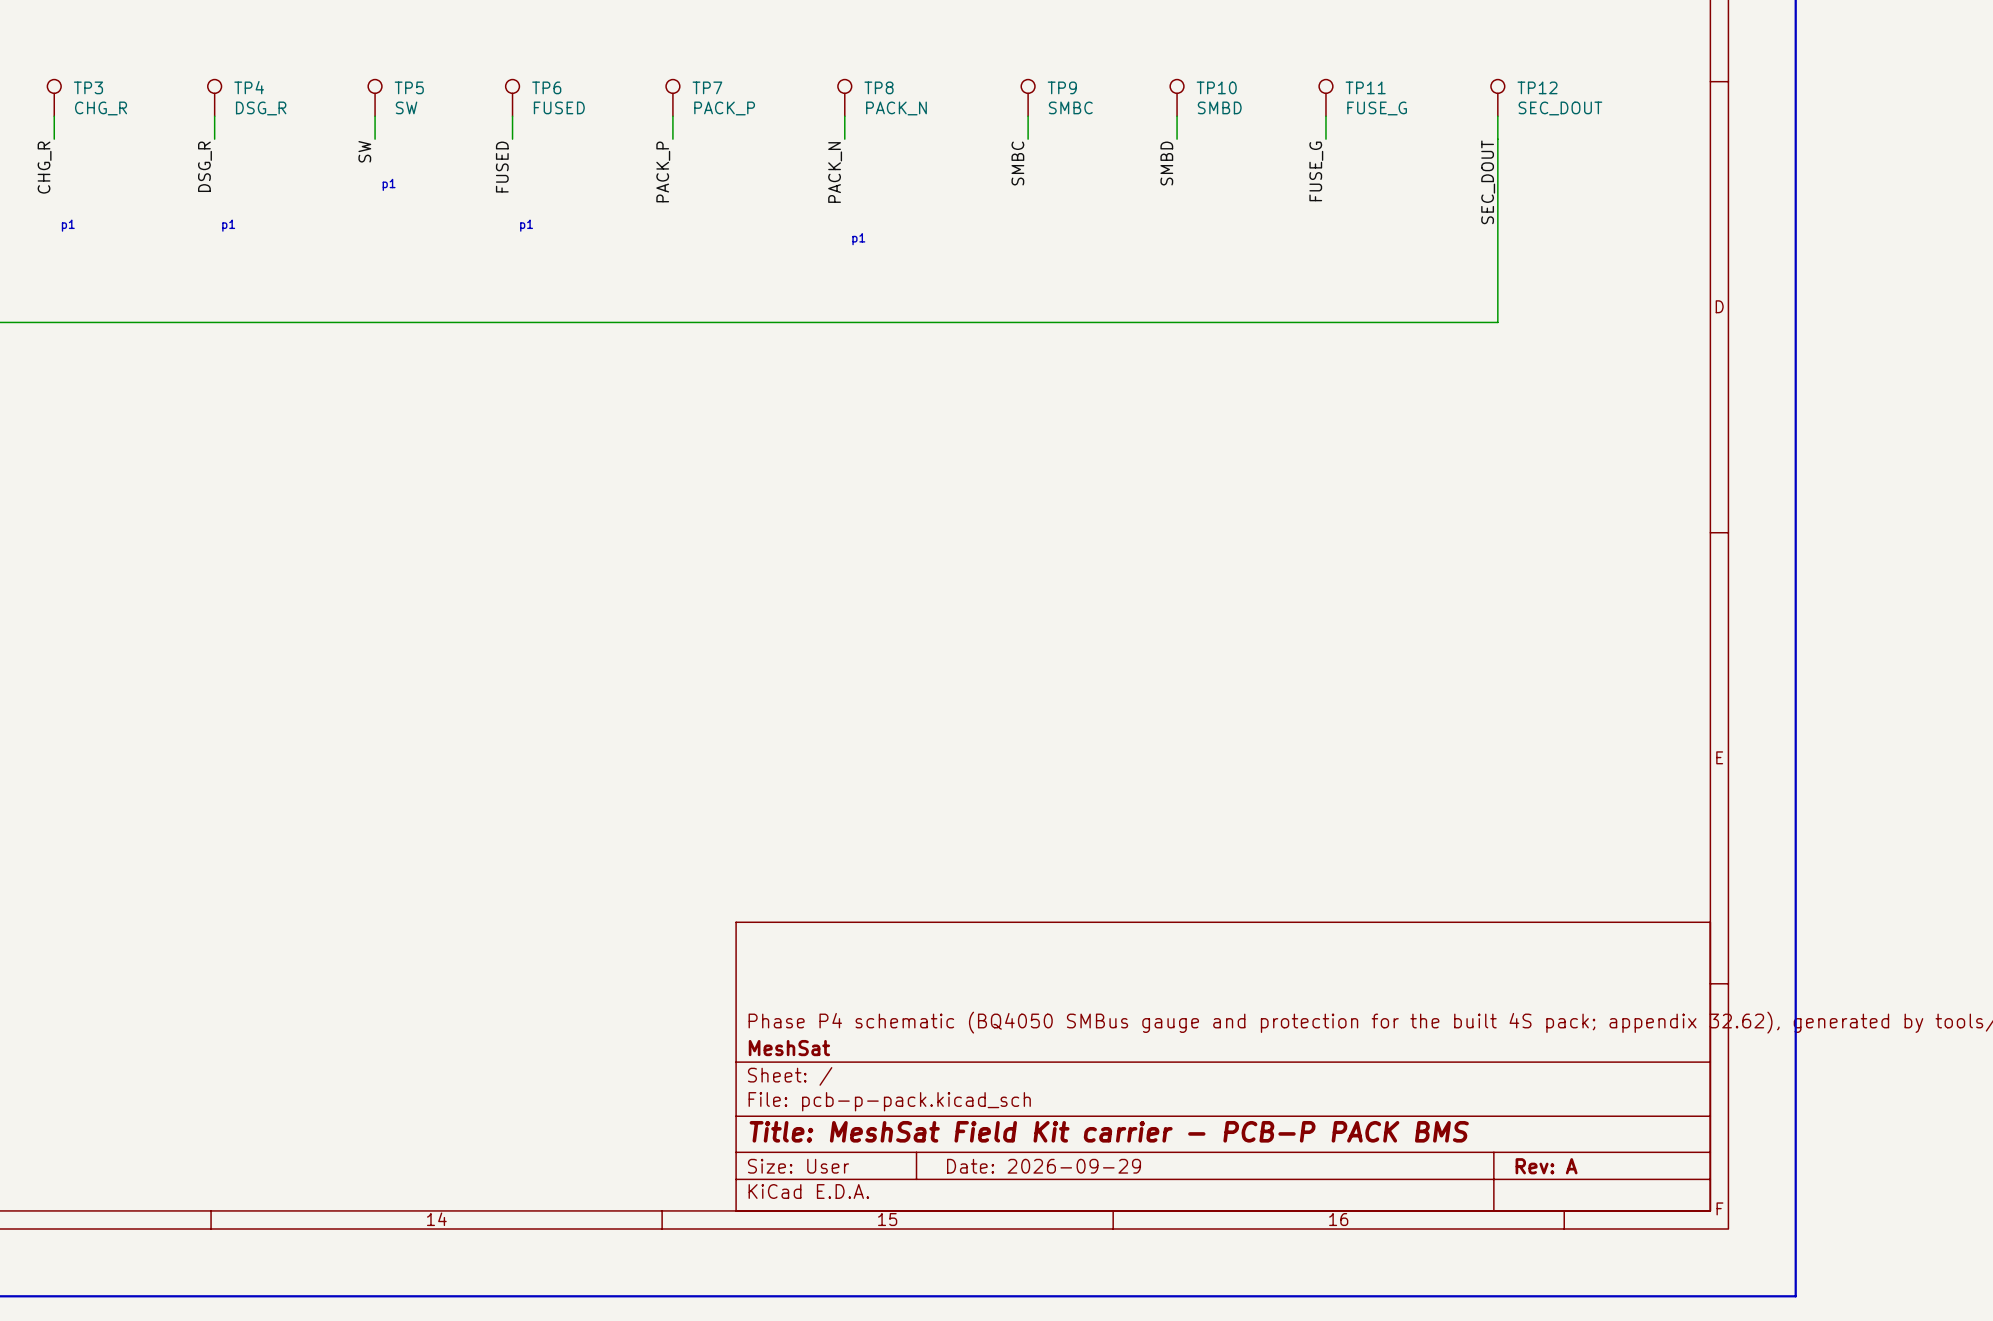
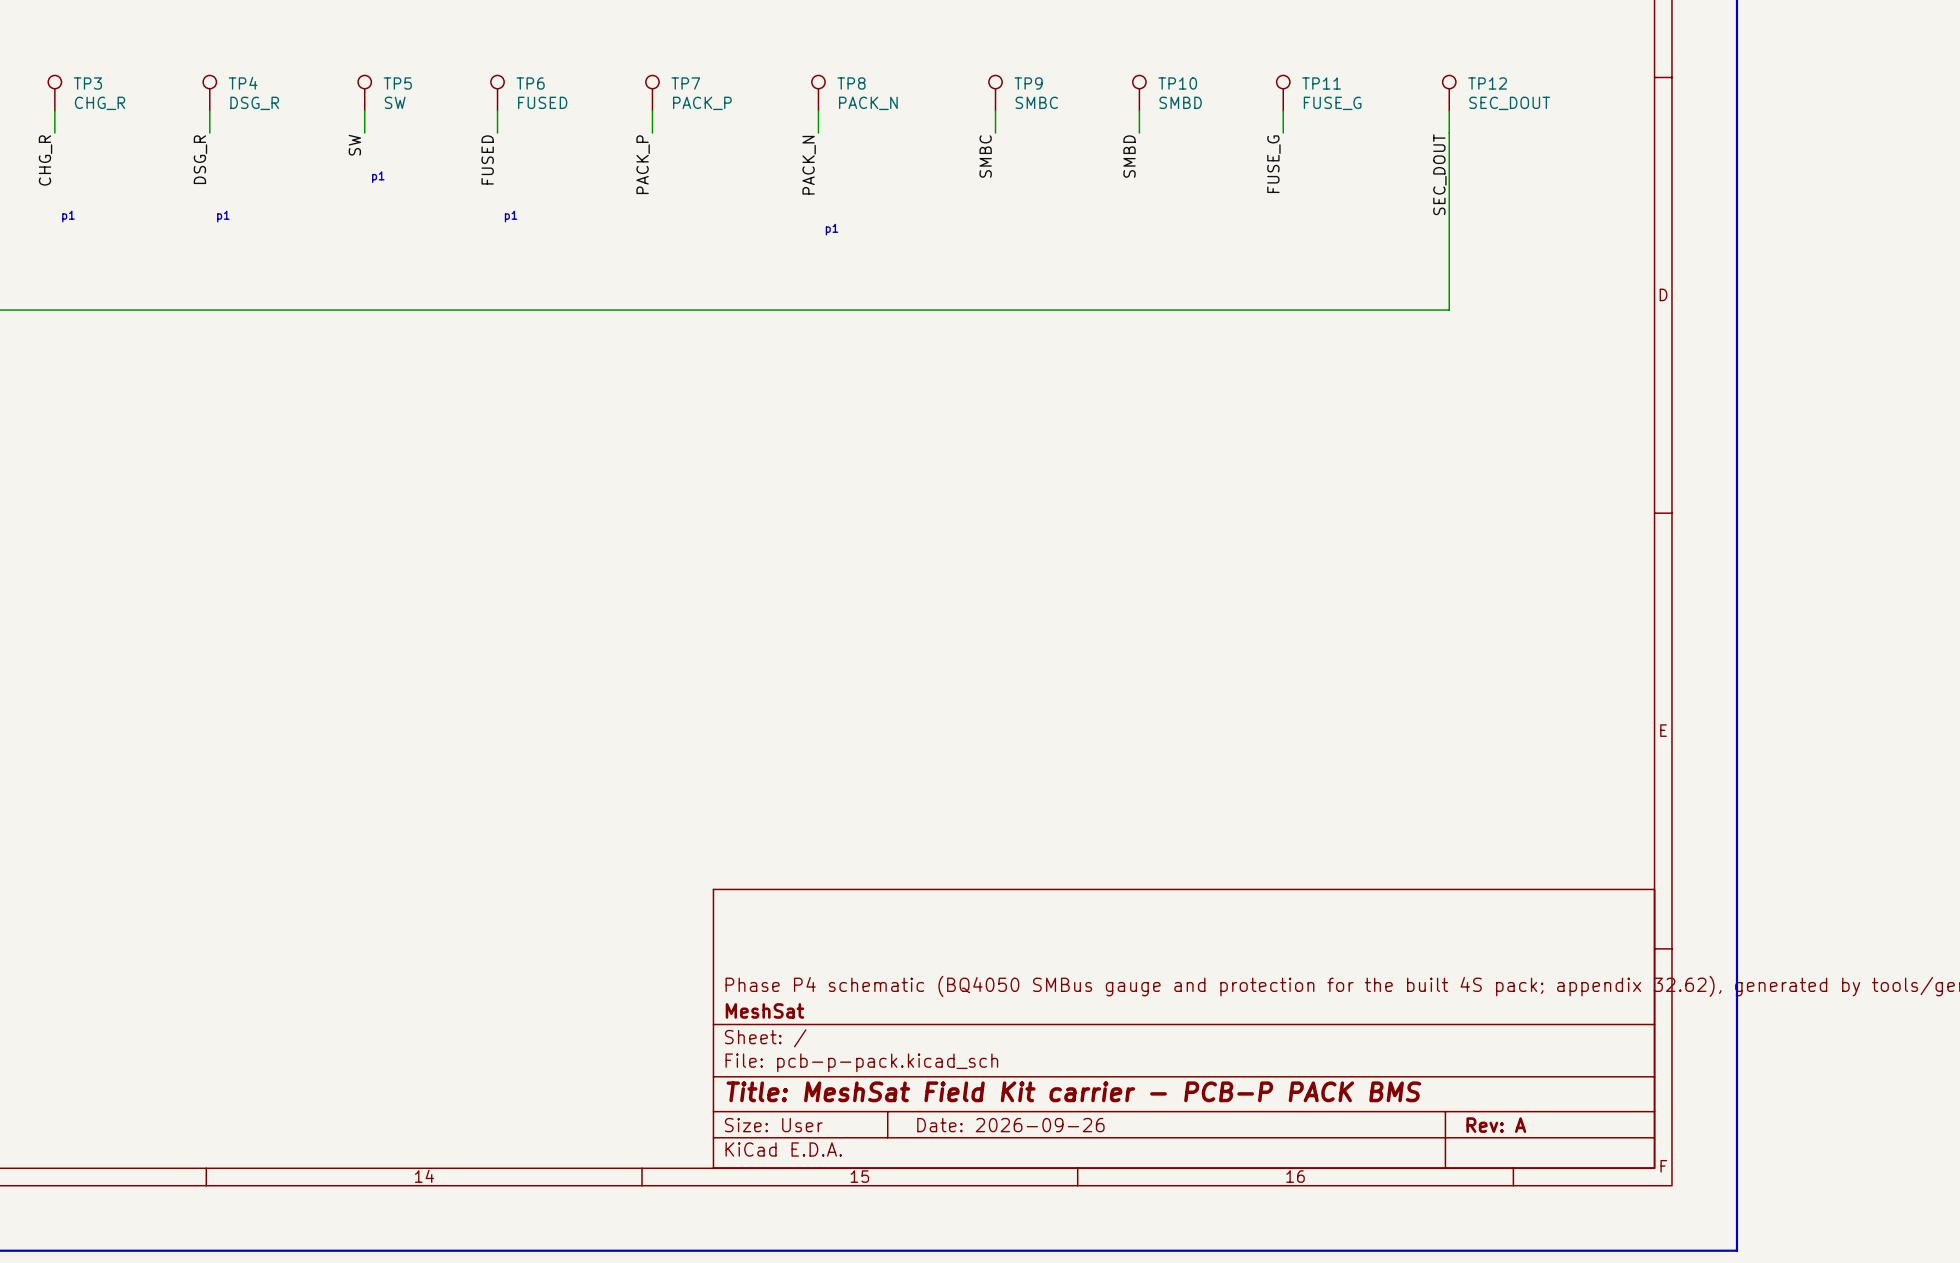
title block: Date: 2026-09-29 (1044, 1166) -> Date: 2026-09-26 (1010, 1125)

